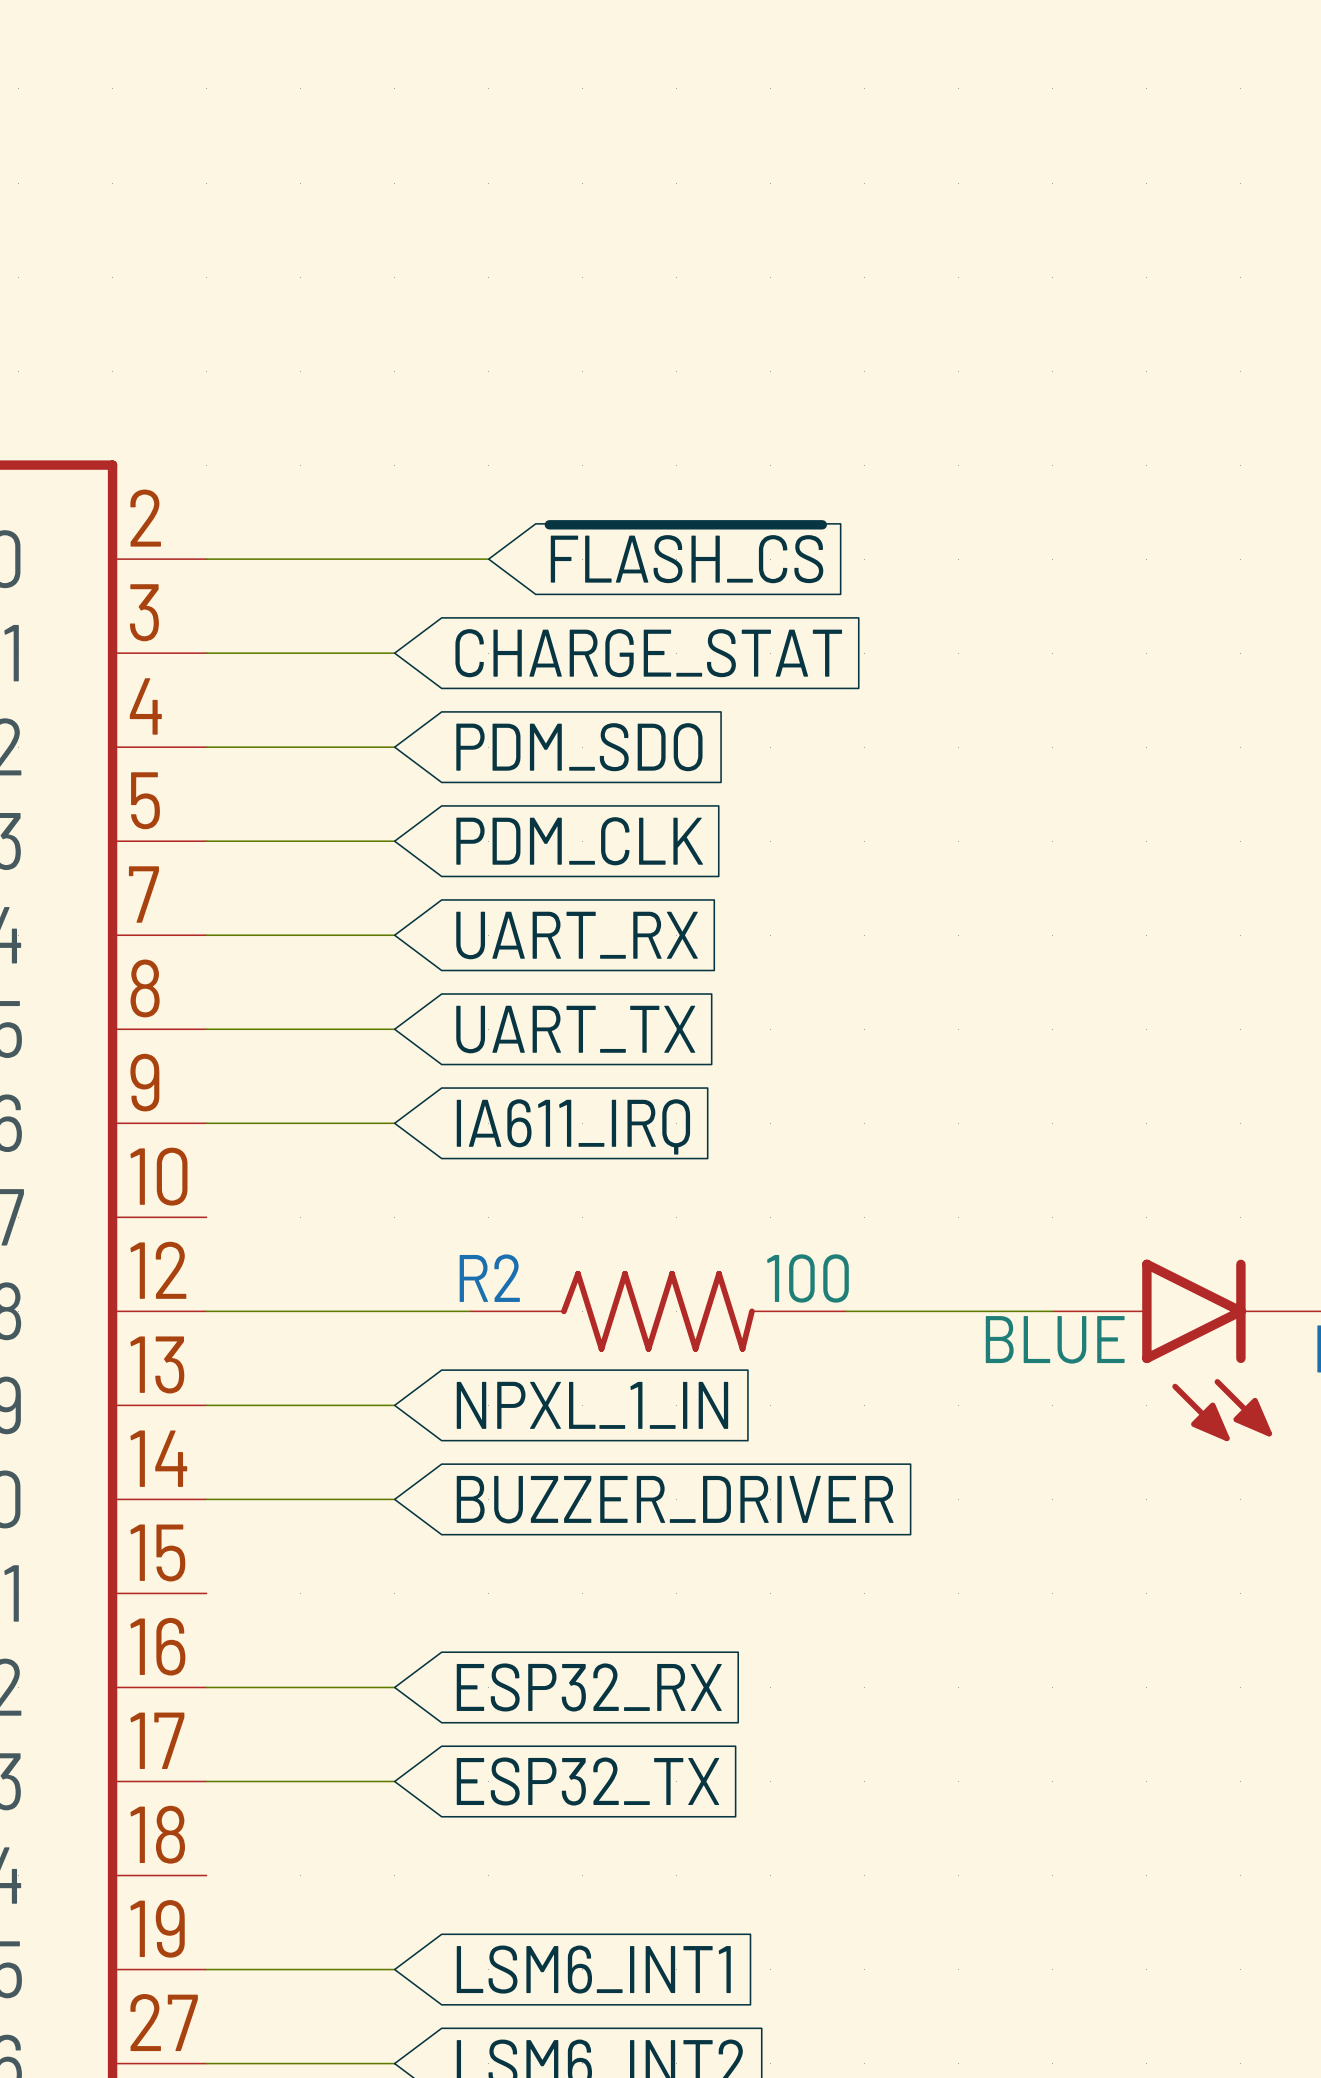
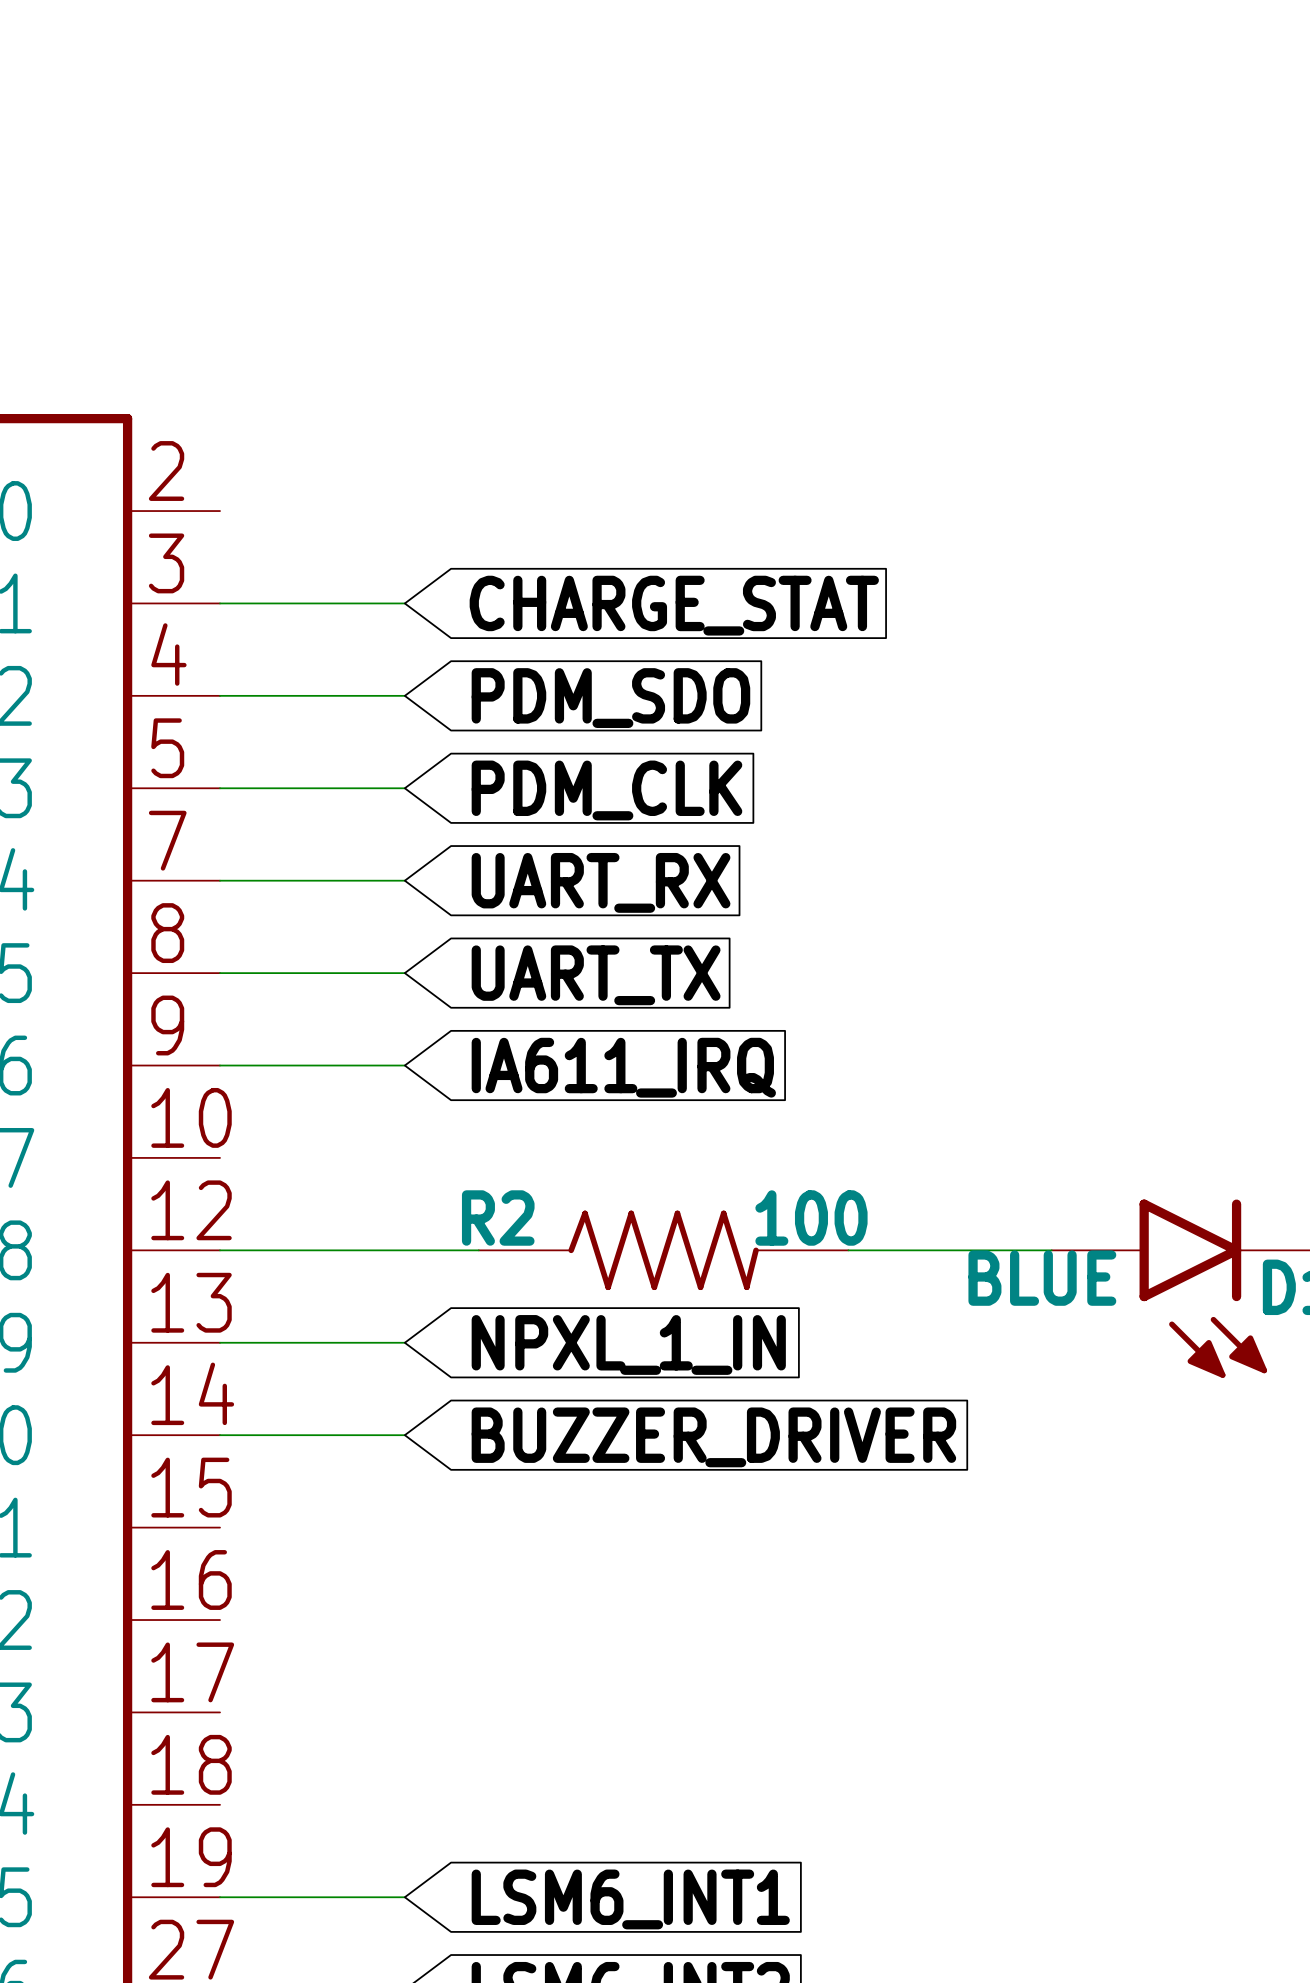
global label: ~{FLASH_CS} (686, 554) -> none
wire: (206, 559) (488, 559) -> none
wire: (206, 1687) (394, 1687) -> none
global label: ESP32_RX (589, 1687) -> none
wire: (206, 1781) (394, 1781) -> none
global label: ESP32_TX (587, 1781) -> none

